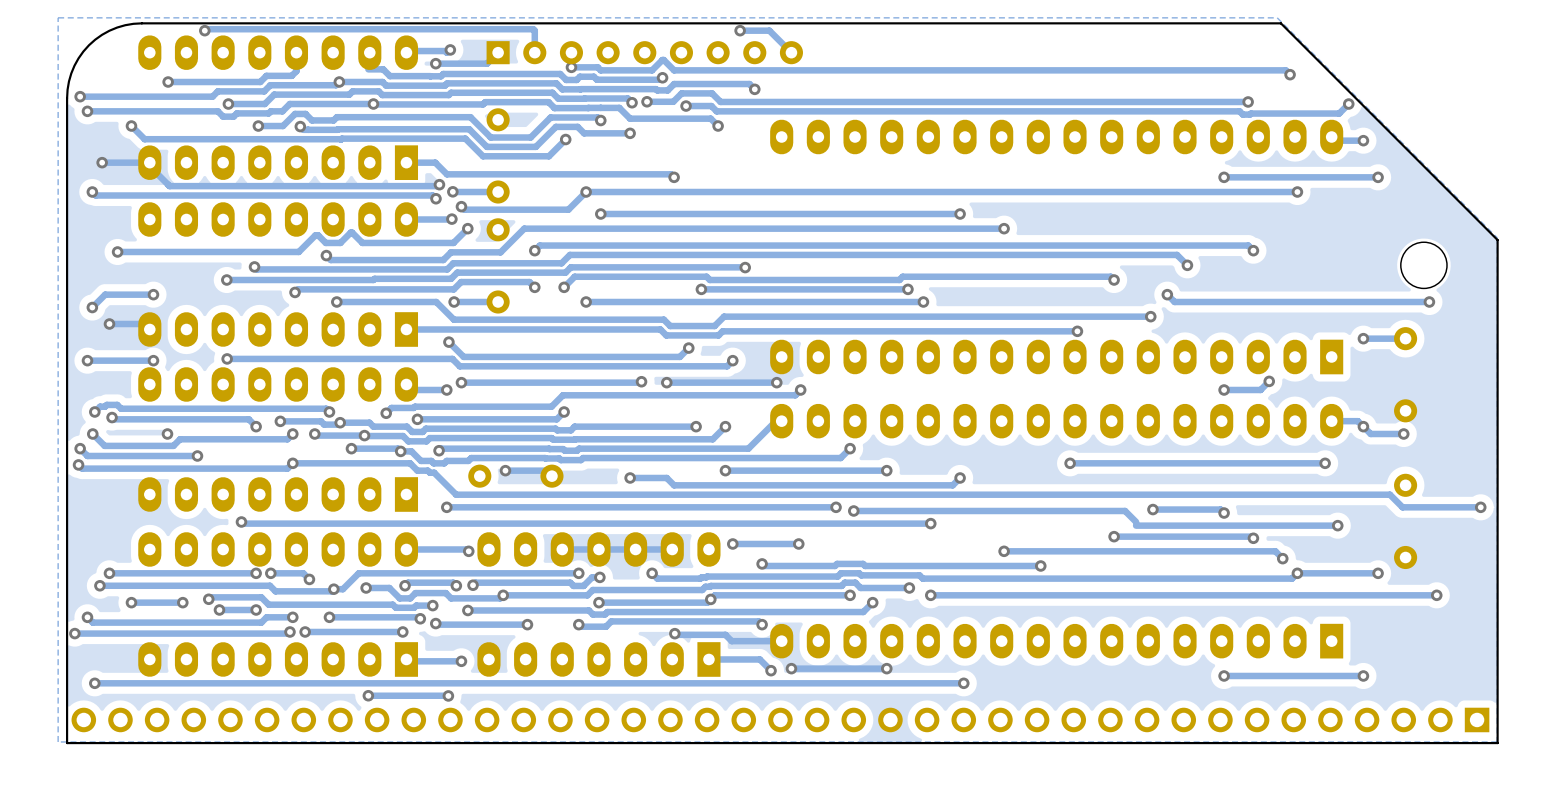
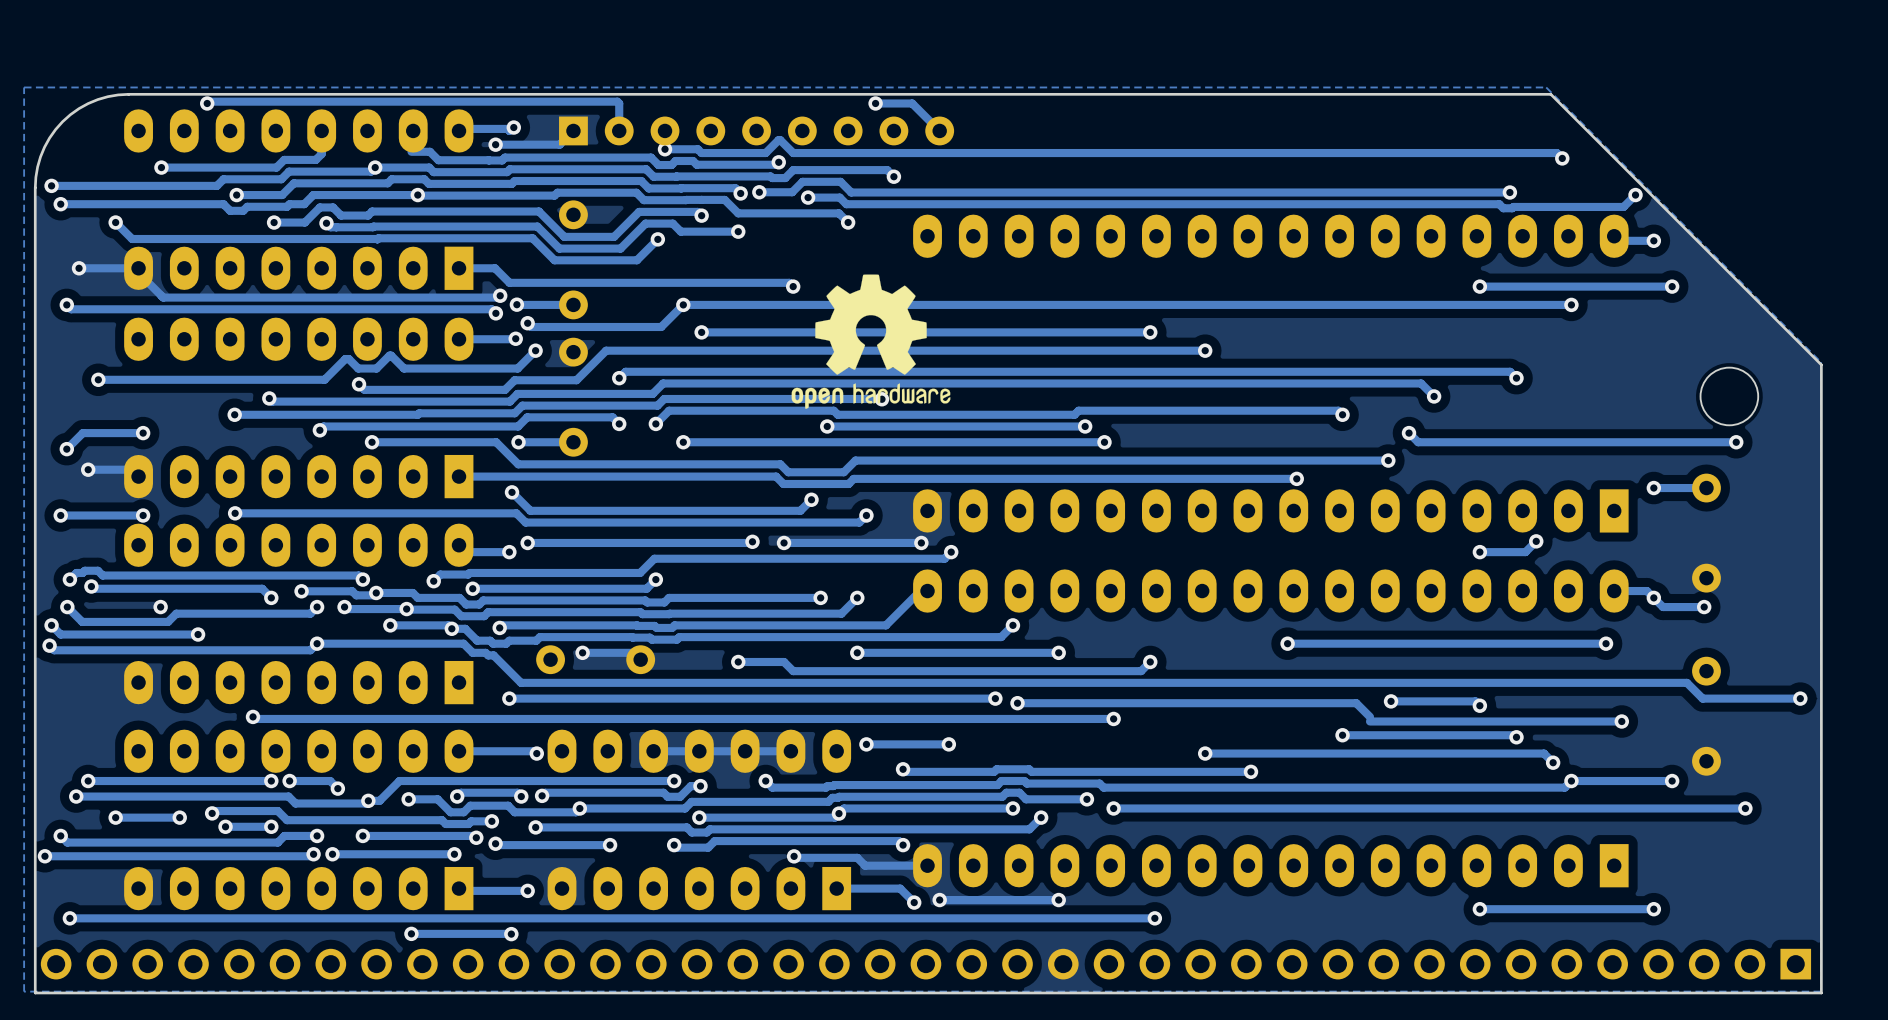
drawing: none -> [791, 274, 951, 409]

